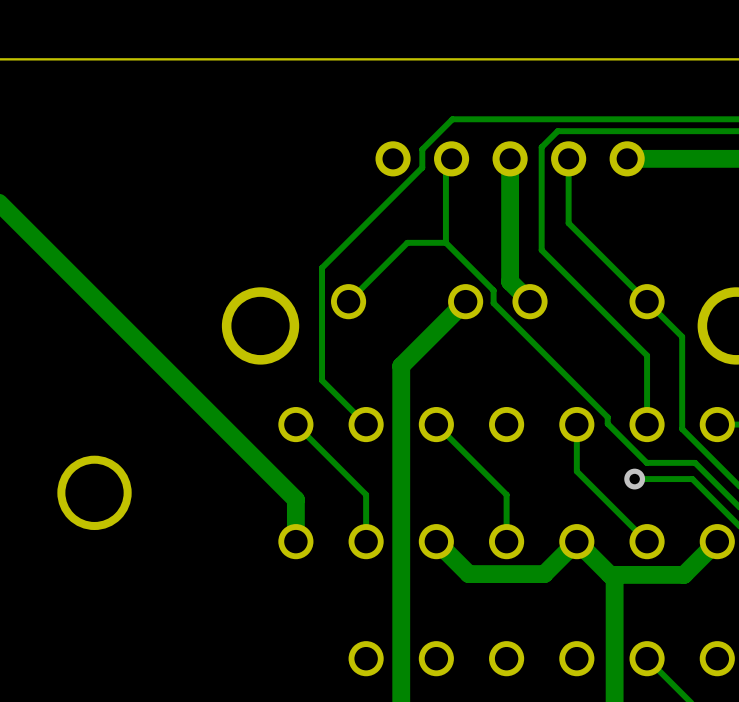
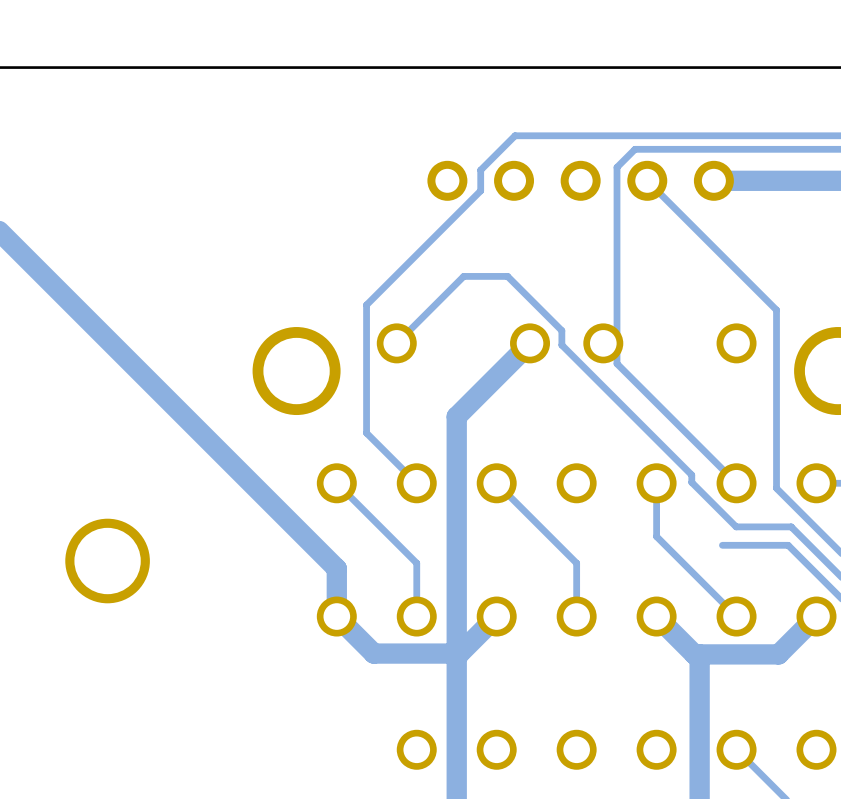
track: (541, 147) (541, 250) (647, 355) (647, 424) -> (617, 167) (617, 363) (736, 483)
track: (451, 158) (445, 164) (445, 242) -> none
track: (510, 158) (510, 281) (530, 301) -> none
track: (568, 158) (568, 223) (682, 336) -> (647, 180) (776, 310) (776, 383)
via: (634, 479) -> none
track: (576, 541) (544, 574) (468, 574) (436, 541) -> (336, 616) (373, 653) (459, 653) (496, 616)

